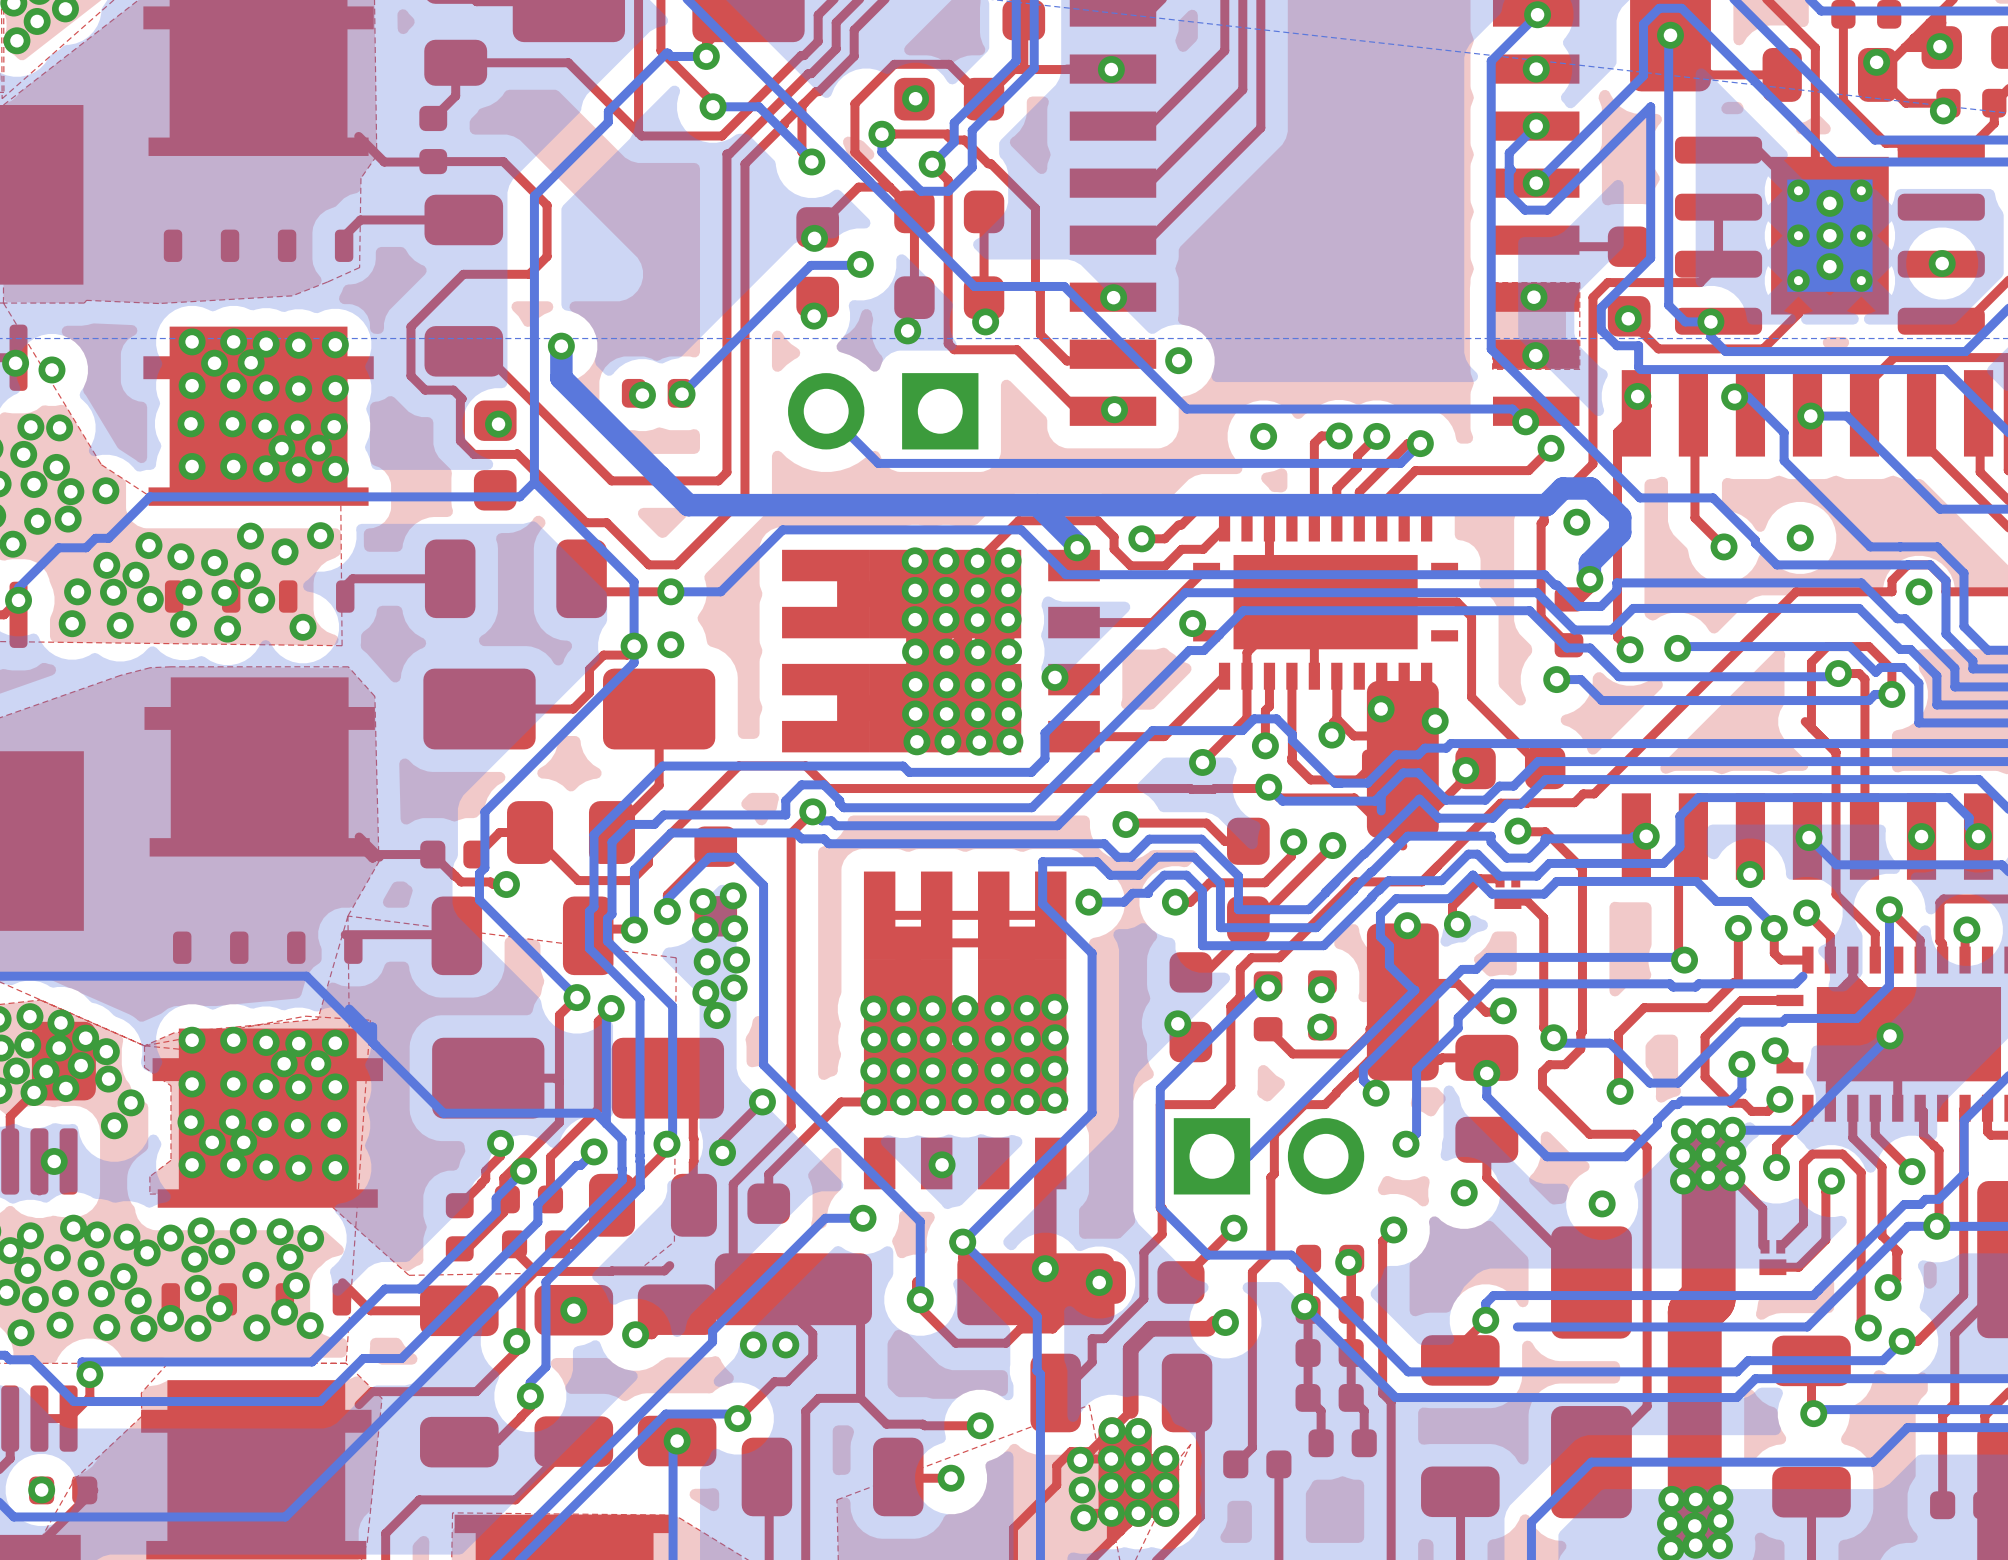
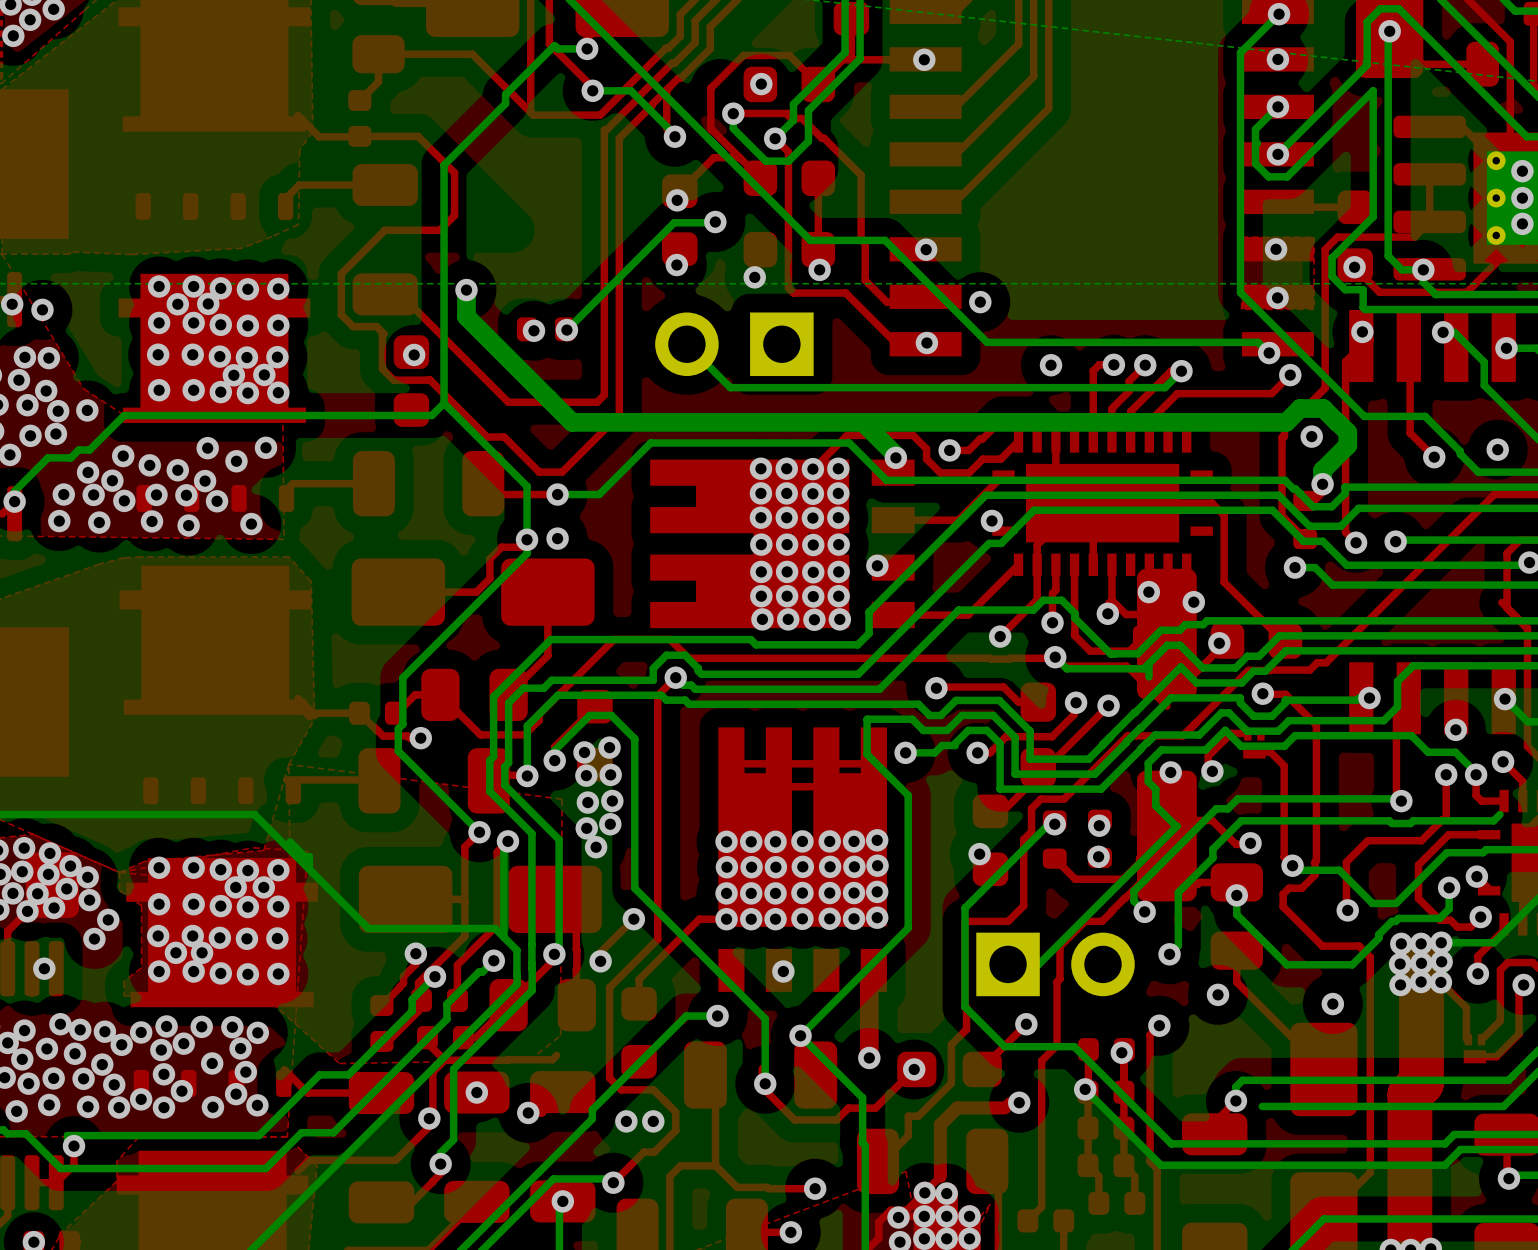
top track: (914, 211) (914, 297) -> none
part footprint: [714, 1253, 1115, 1326] -> [683, 1041, 838, 1109]

